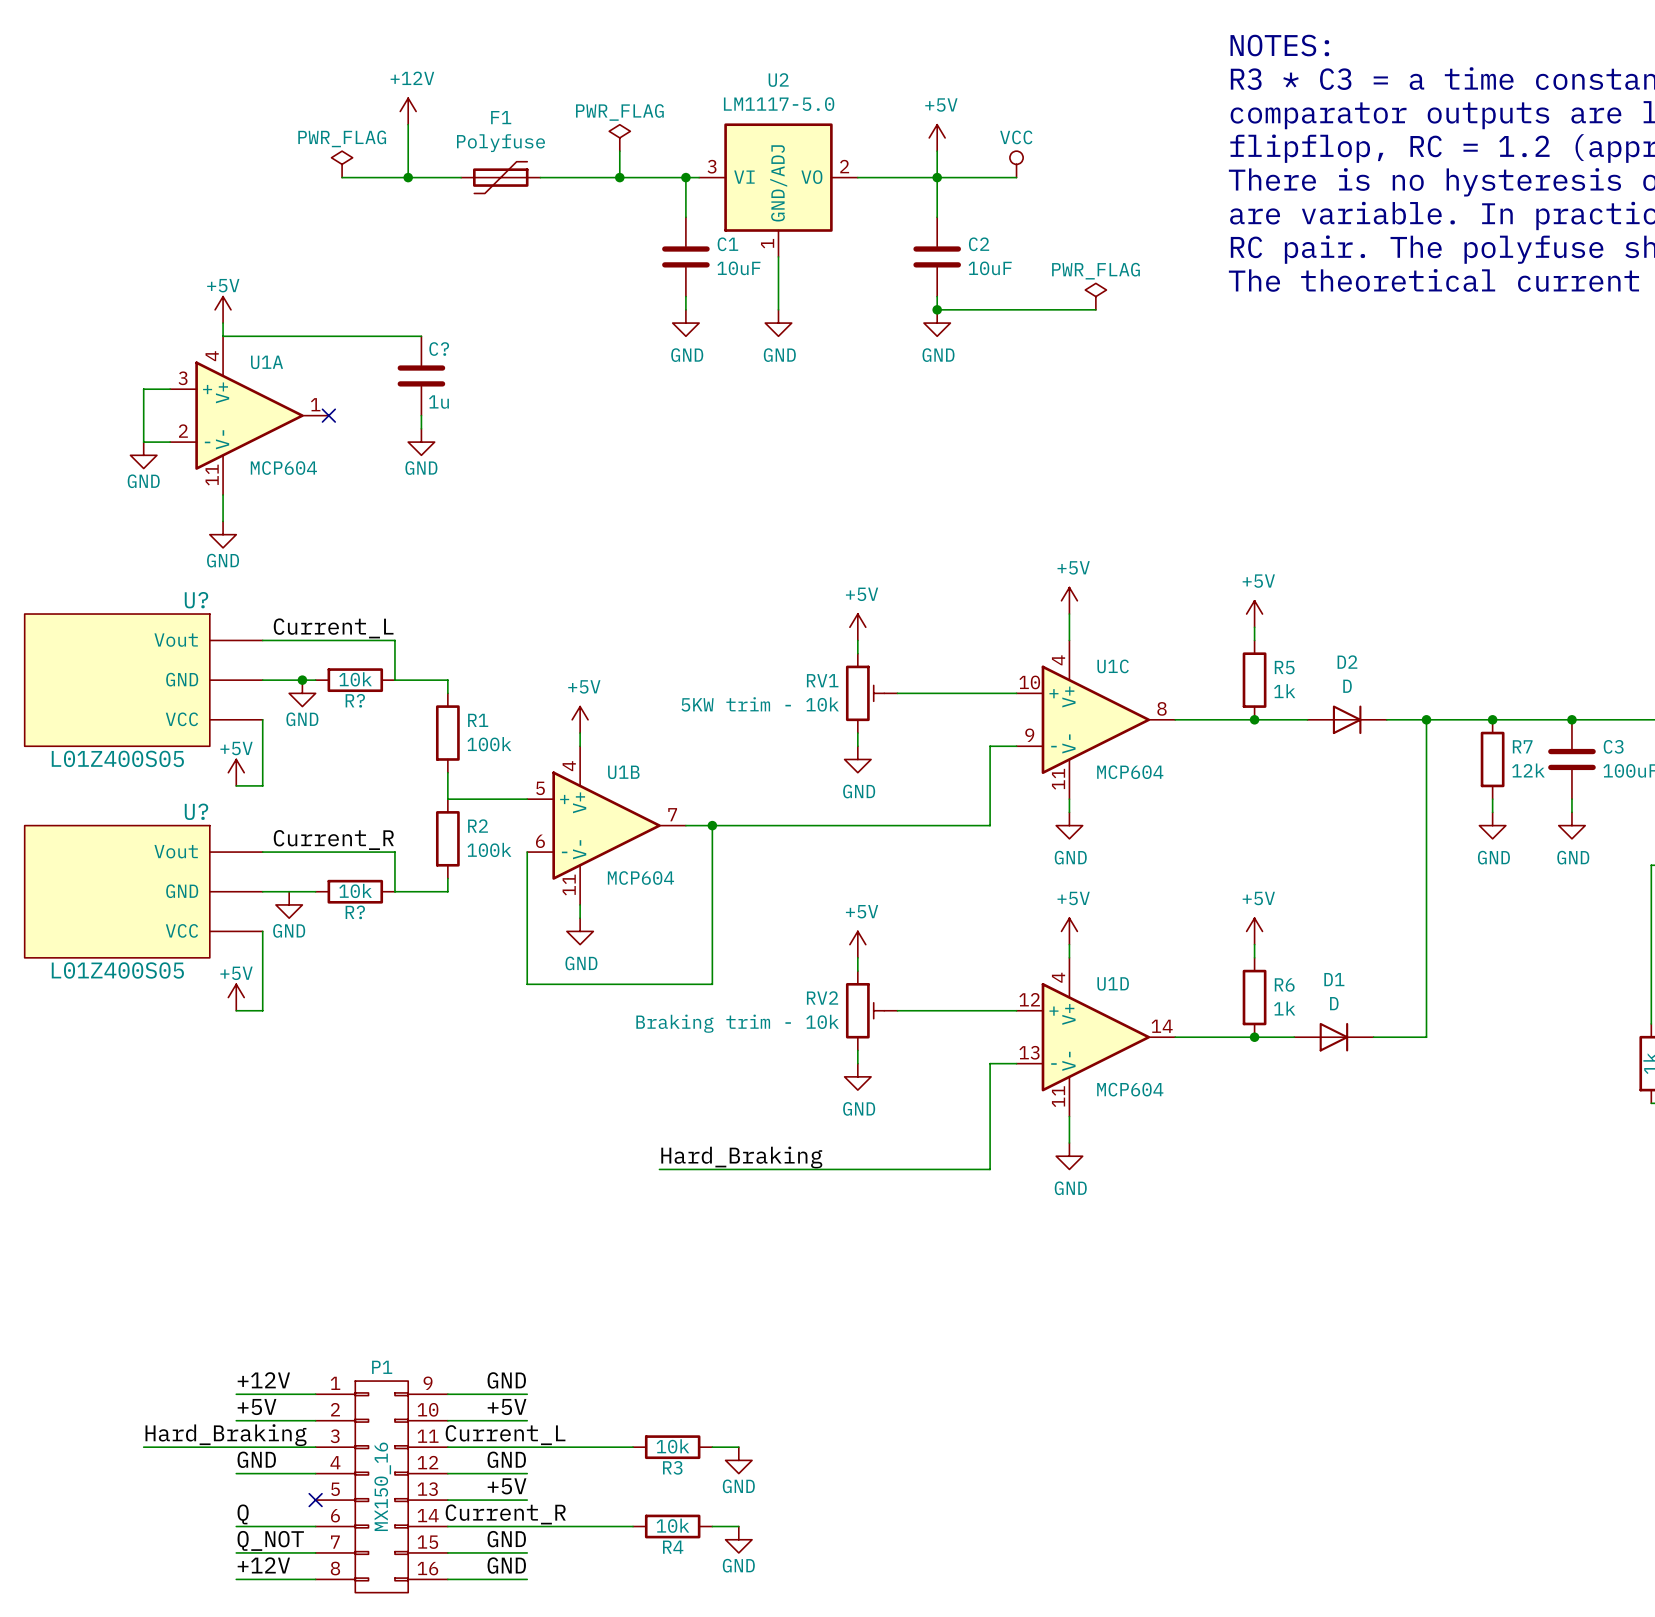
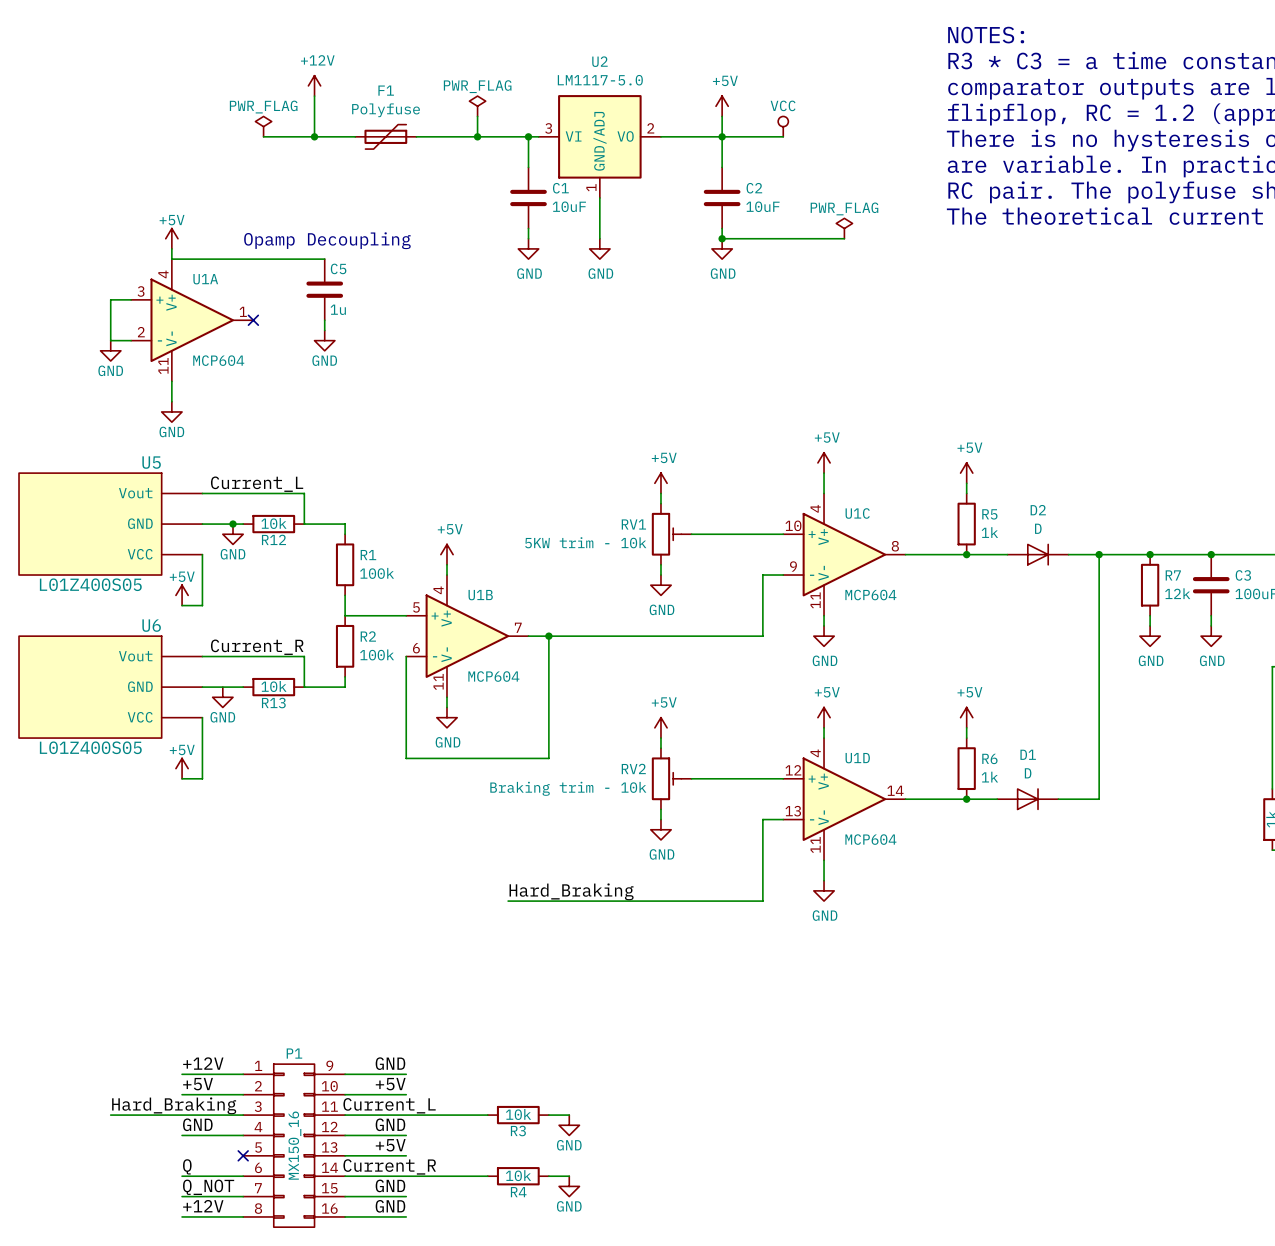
text: none -> Opamp Decoupling (327, 240)
C? name: C? (439, 349) -> C5 (338, 268)
U? name: U? (196, 600) -> U5 (151, 462)
R? name: R? (355, 700) -> R12 (273, 539)
U? name: U? (196, 811) -> U6 (151, 625)
R? name: R? (355, 912) -> R13 (273, 703)

